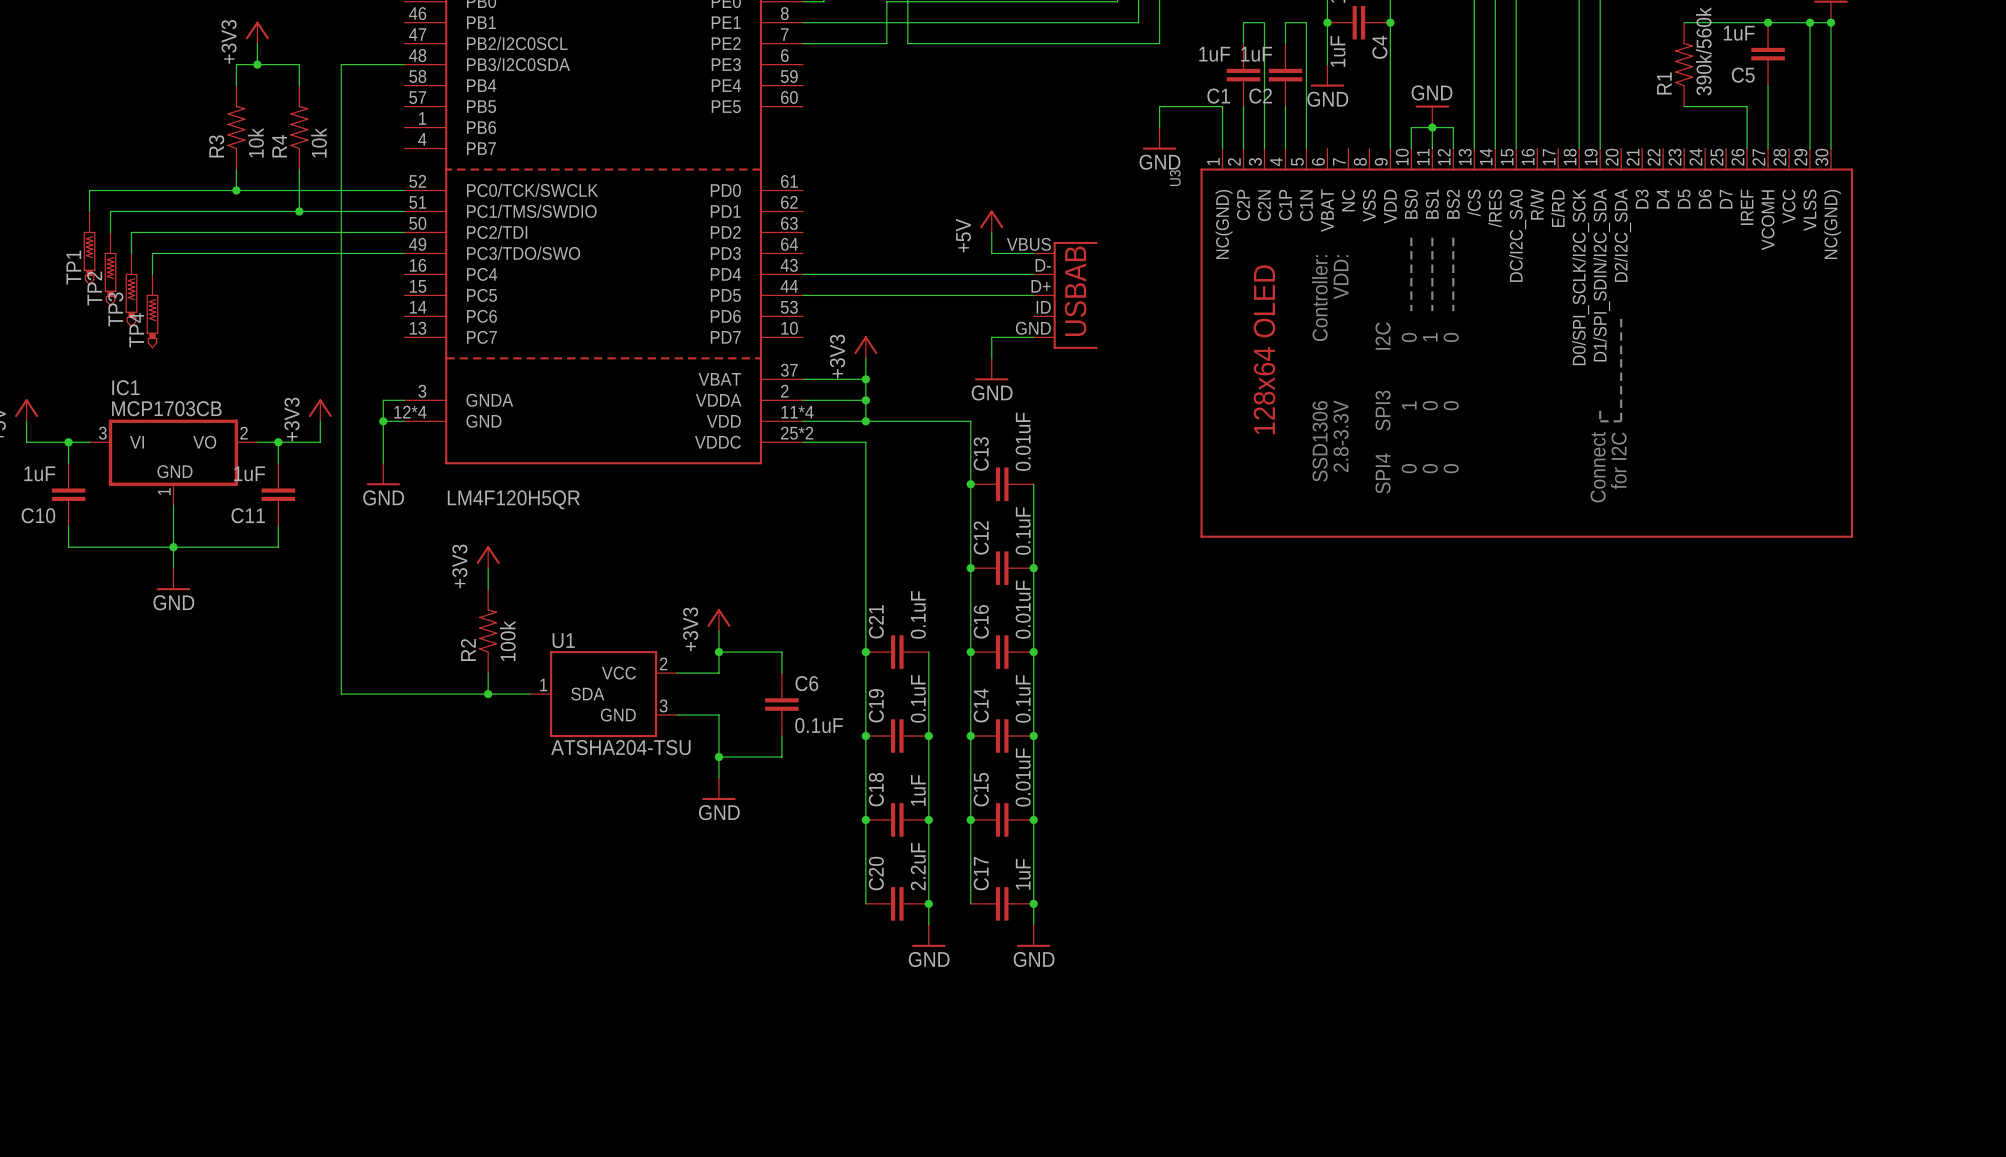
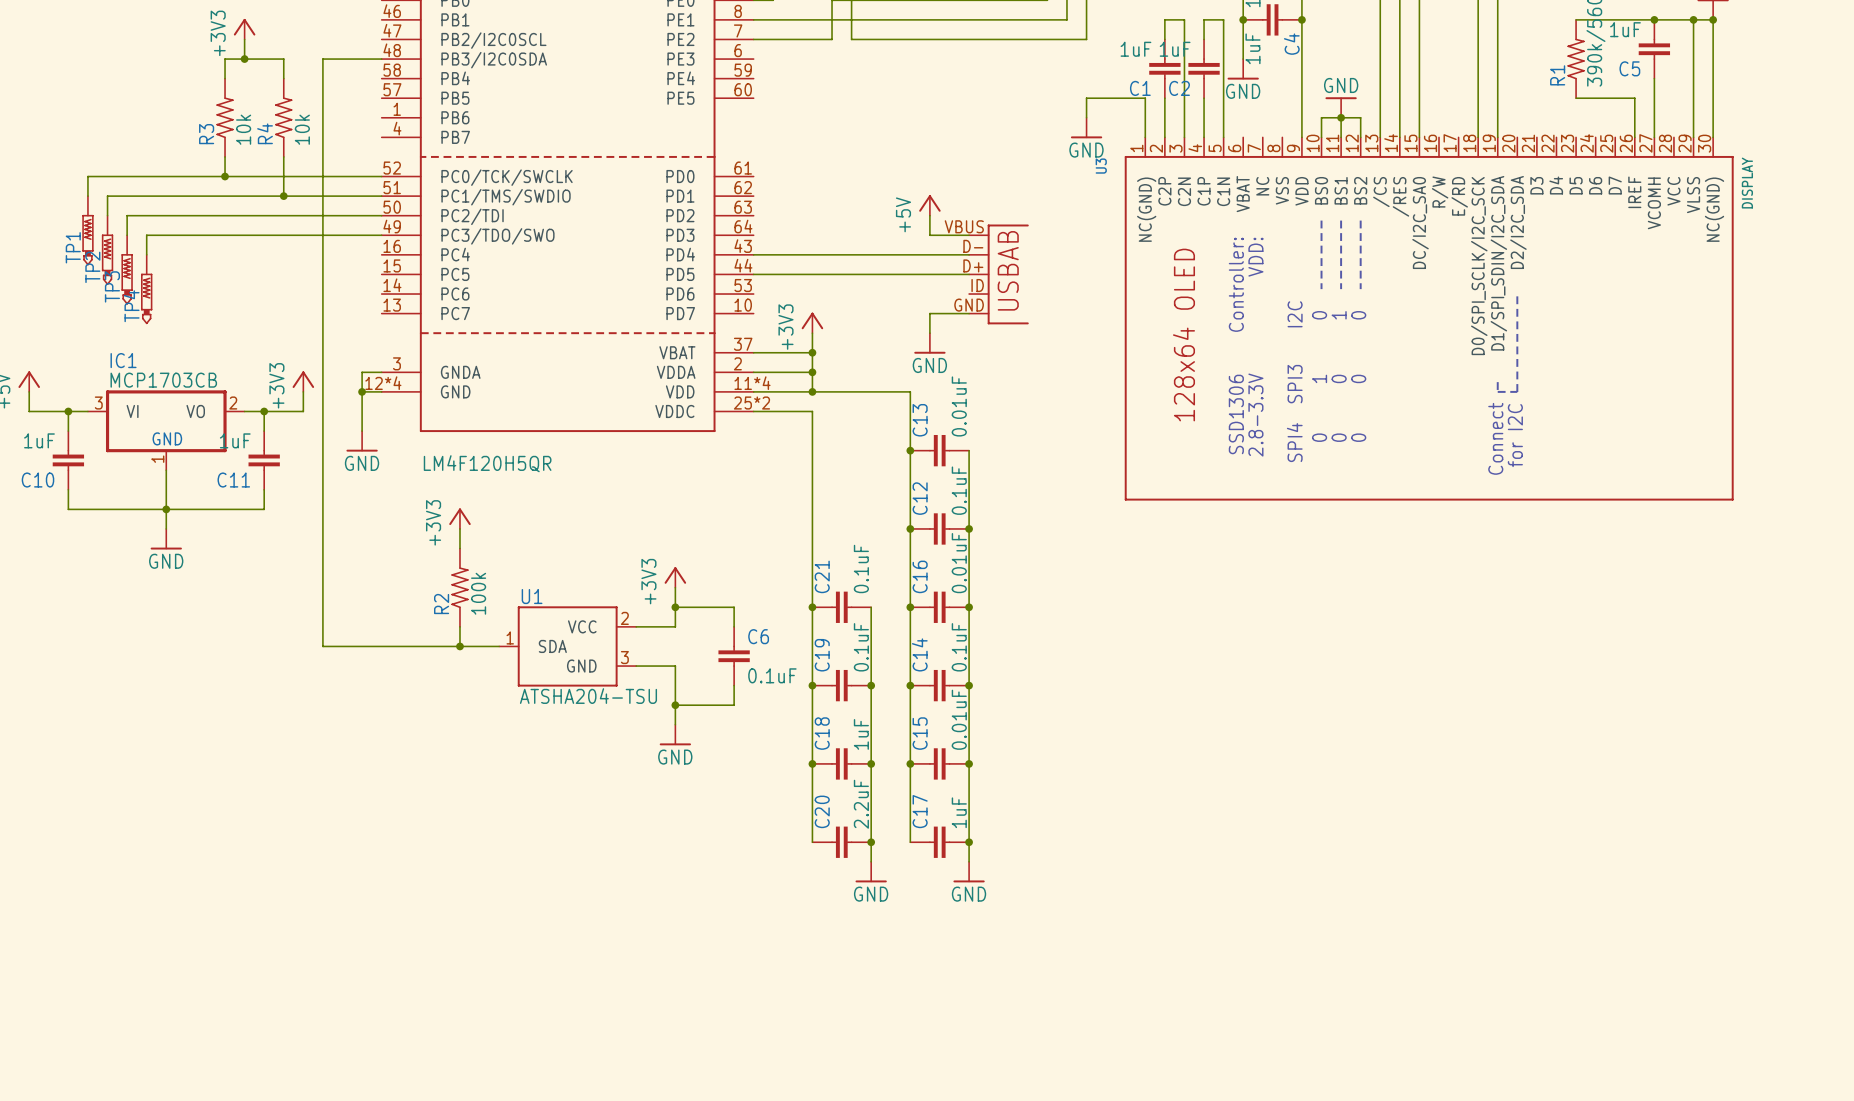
U3 value: none -> DISPLAY (1747, 183)

